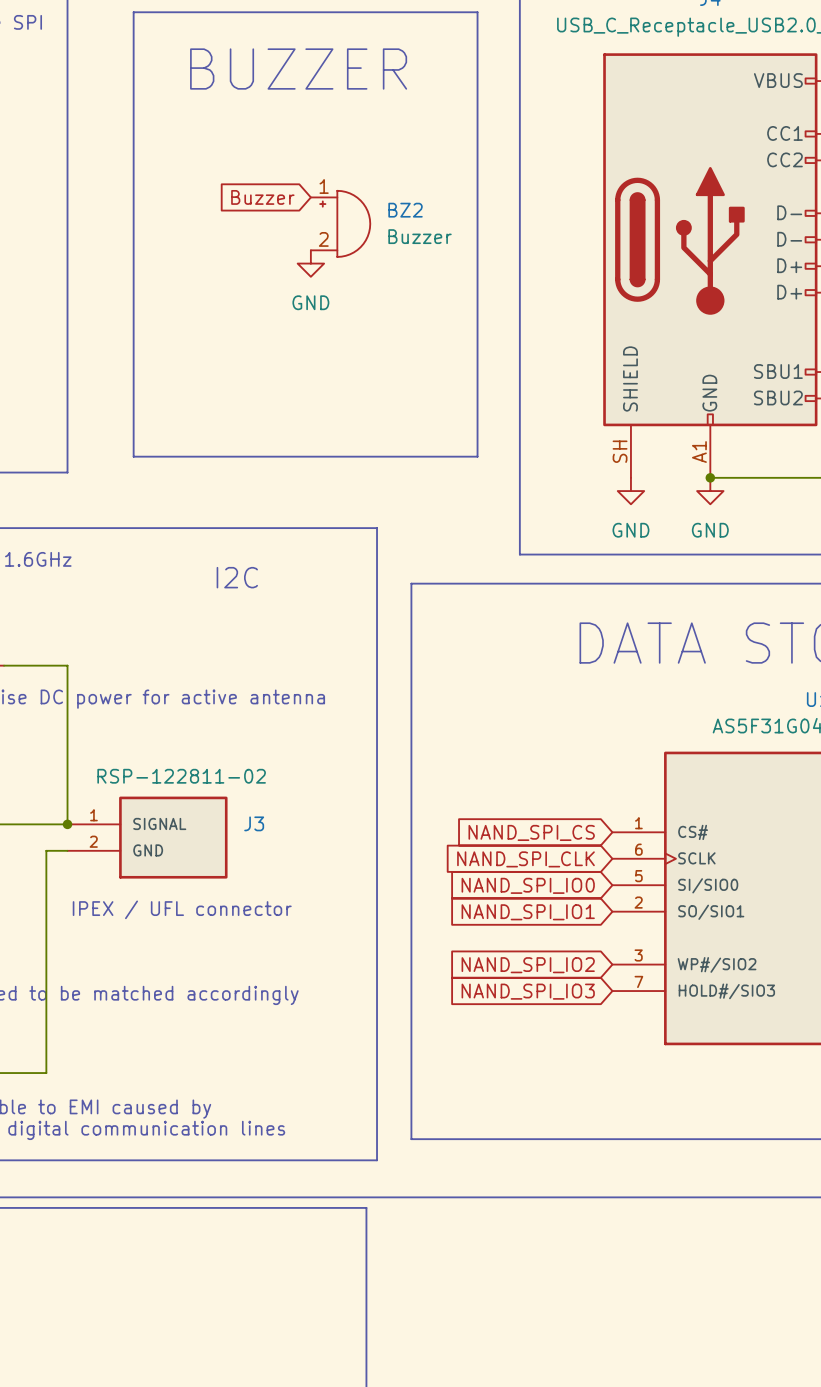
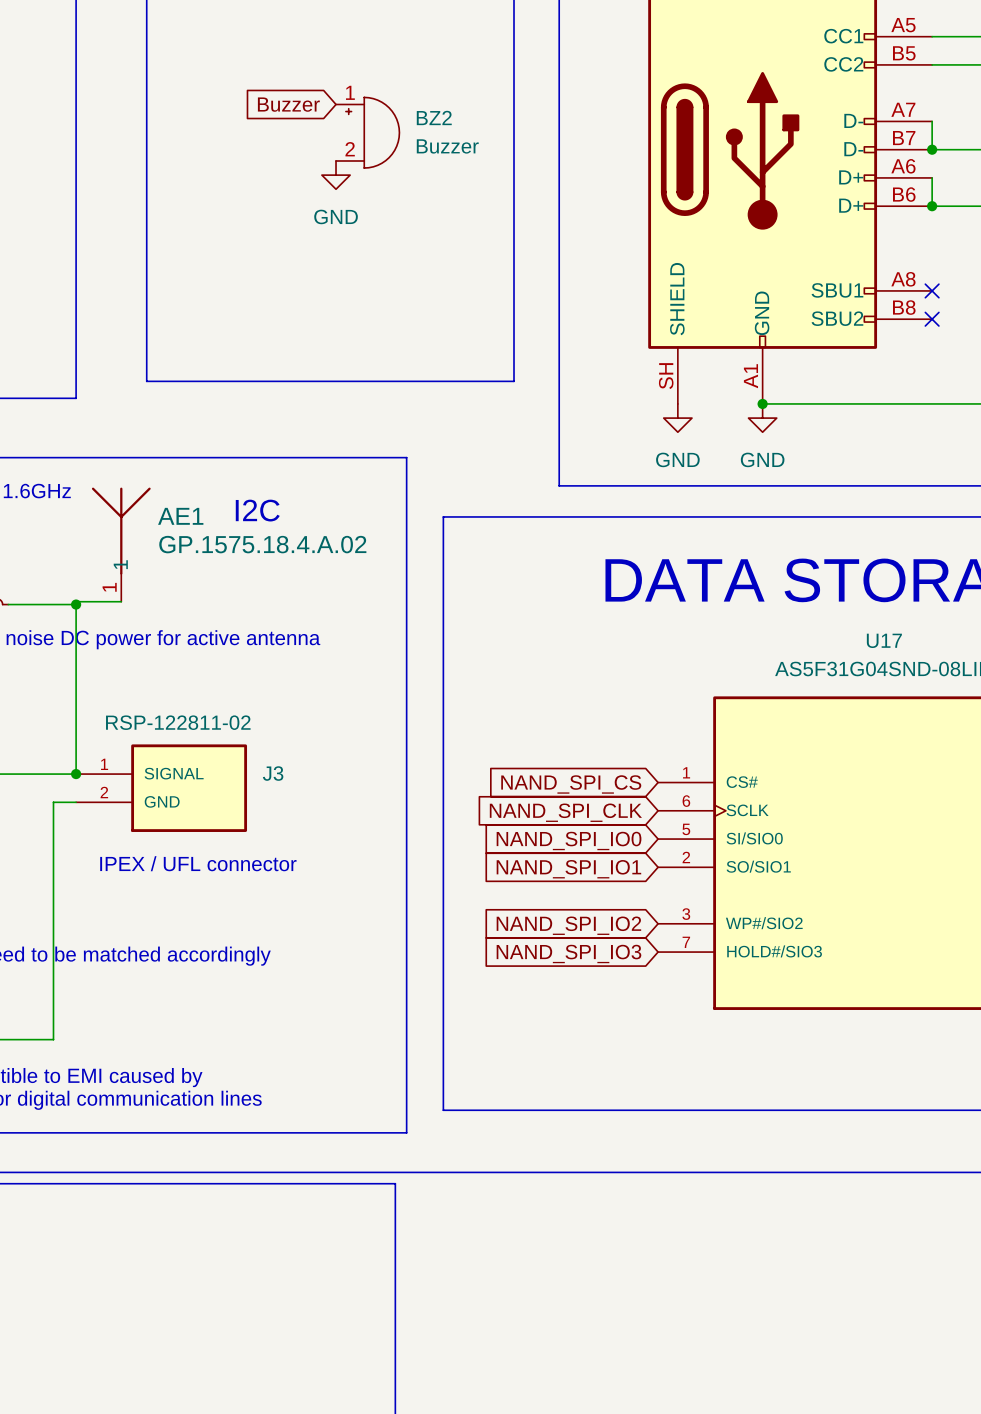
AE1: none -> GP.1575.18.4.A.02 (121, 544)
wire: none -> (121, 601) (76, 601) (76, 604)
junction: none -> (76, 604)

